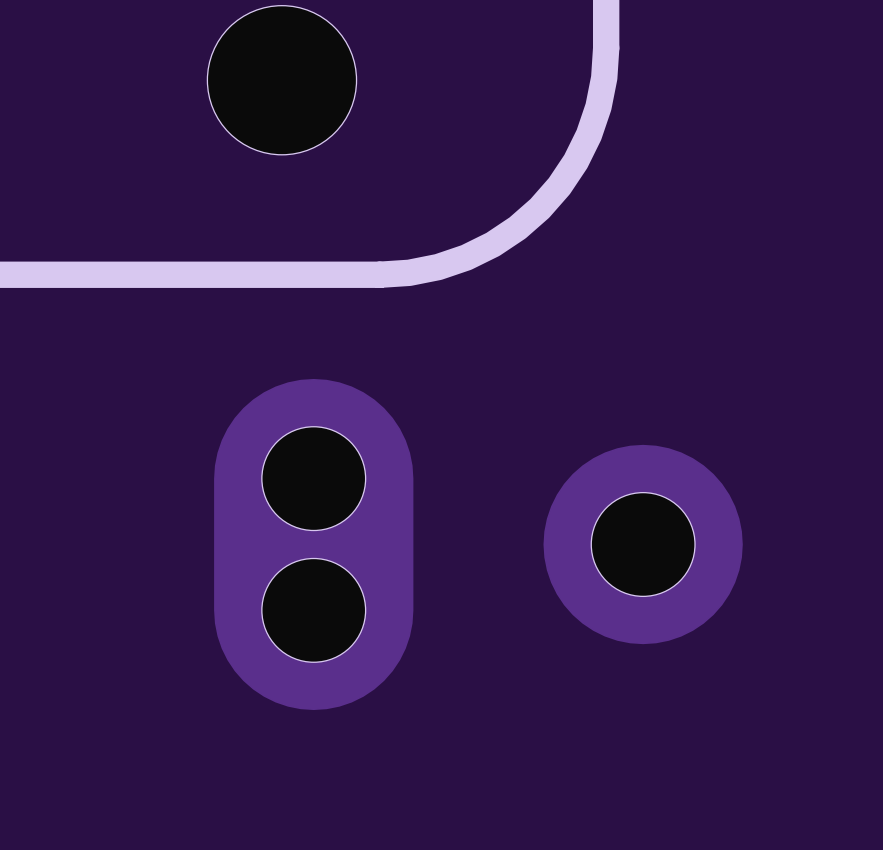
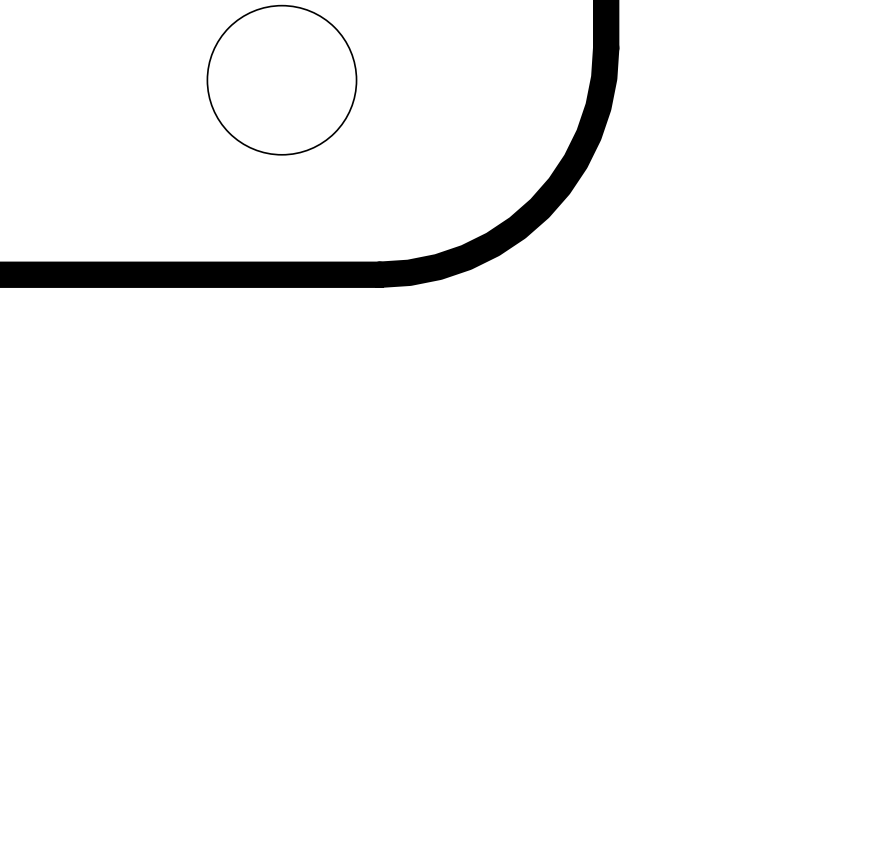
part: (478, 544) -> none

